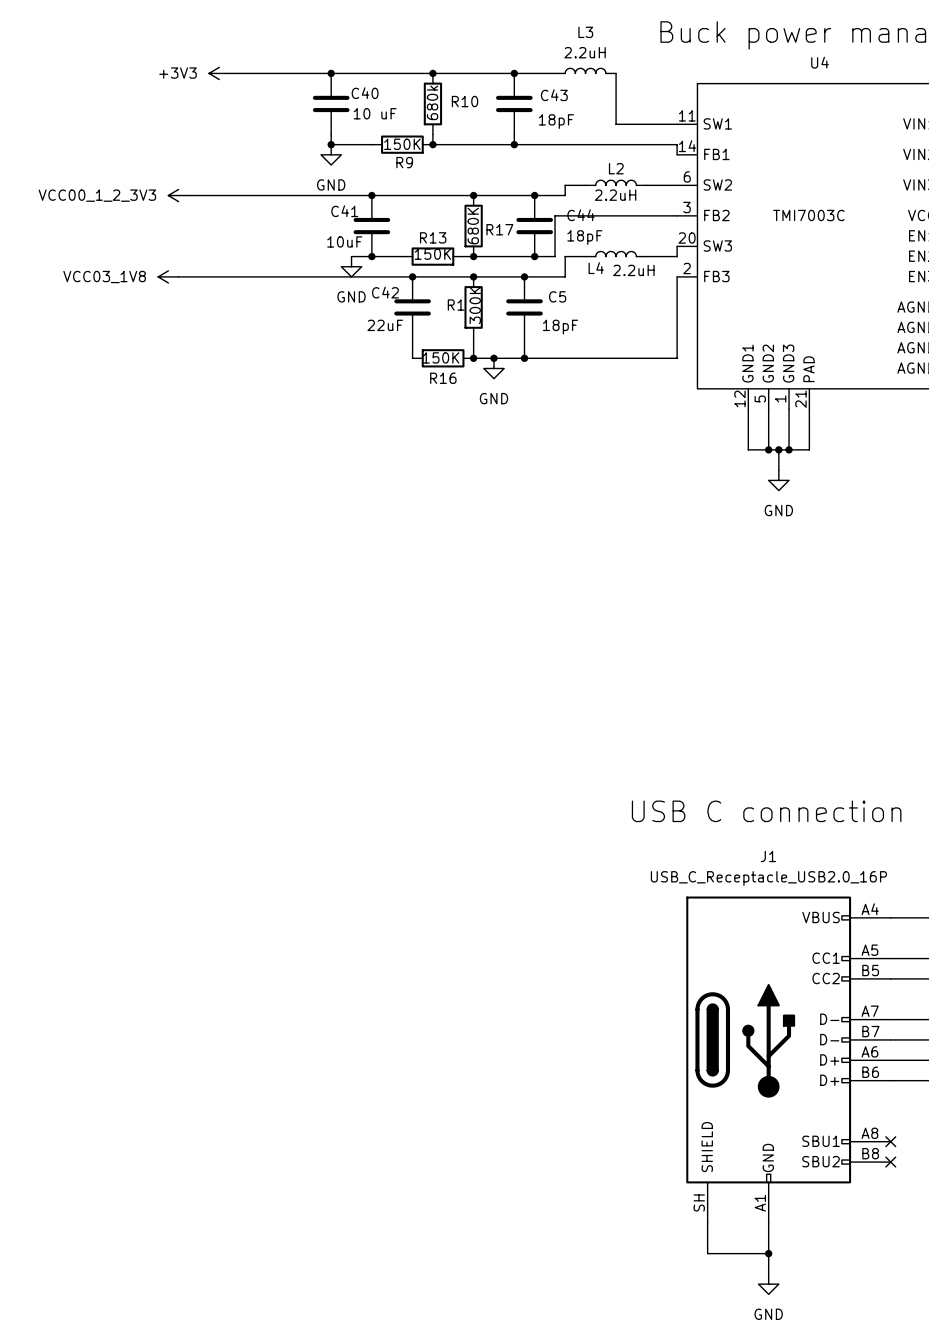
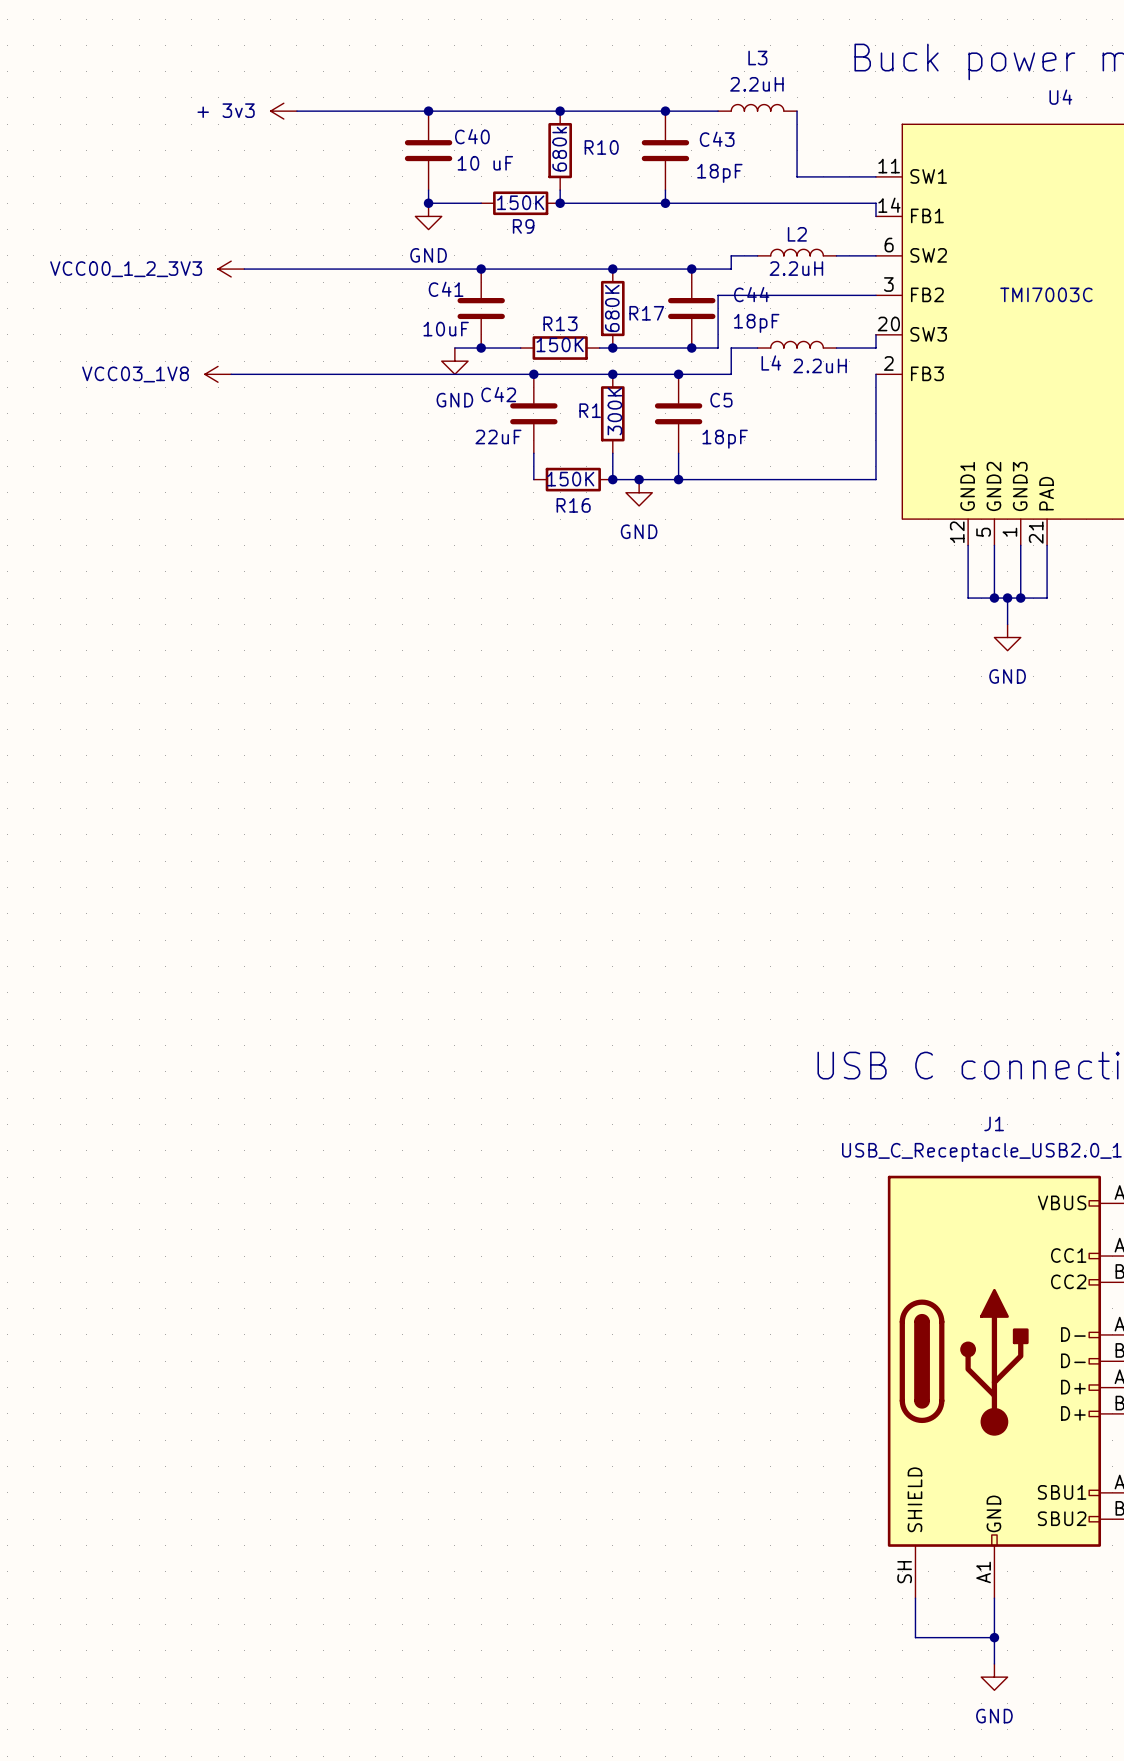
power symbol: +3V3 (219, 73) -> + 3v3 (283, 111)

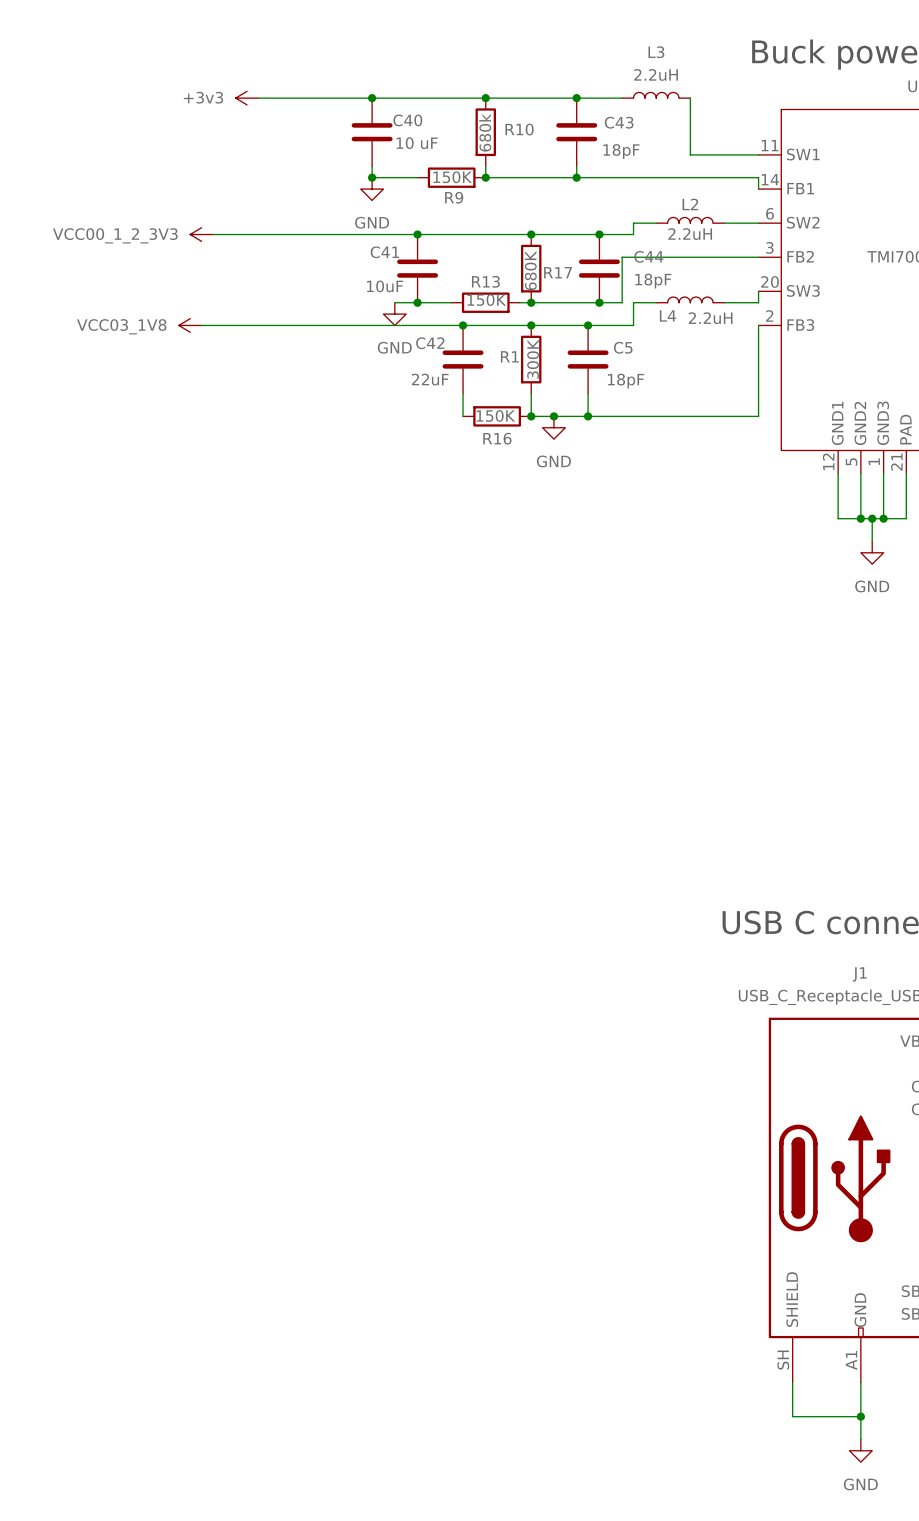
power symbol: + 3v3 (283, 111) -> +3v3 (247, 98)

